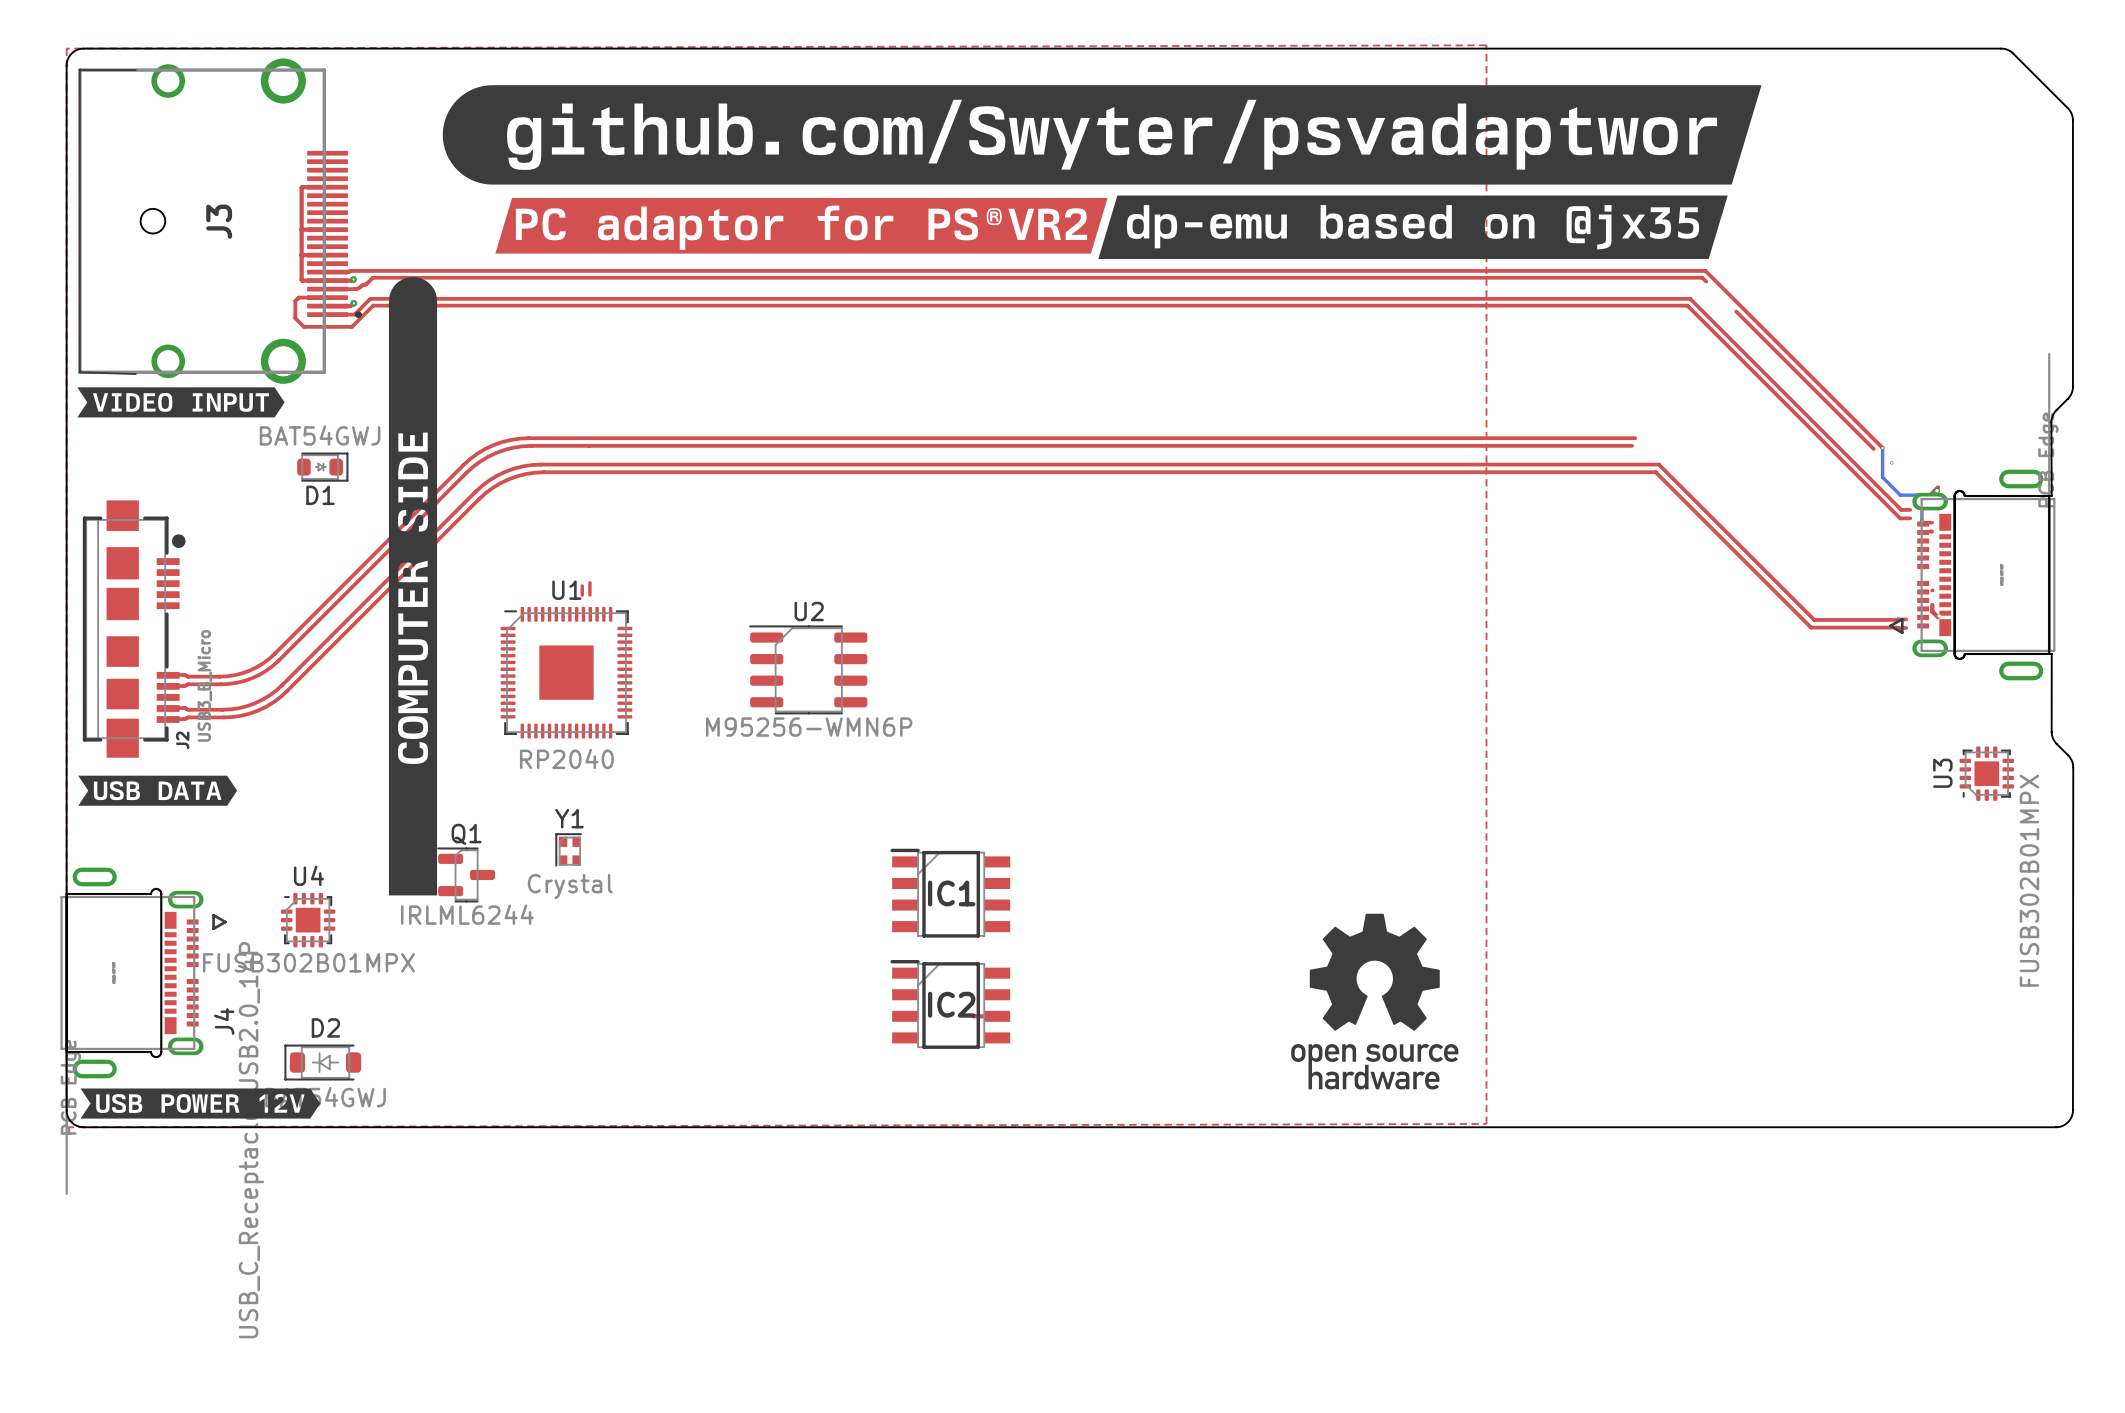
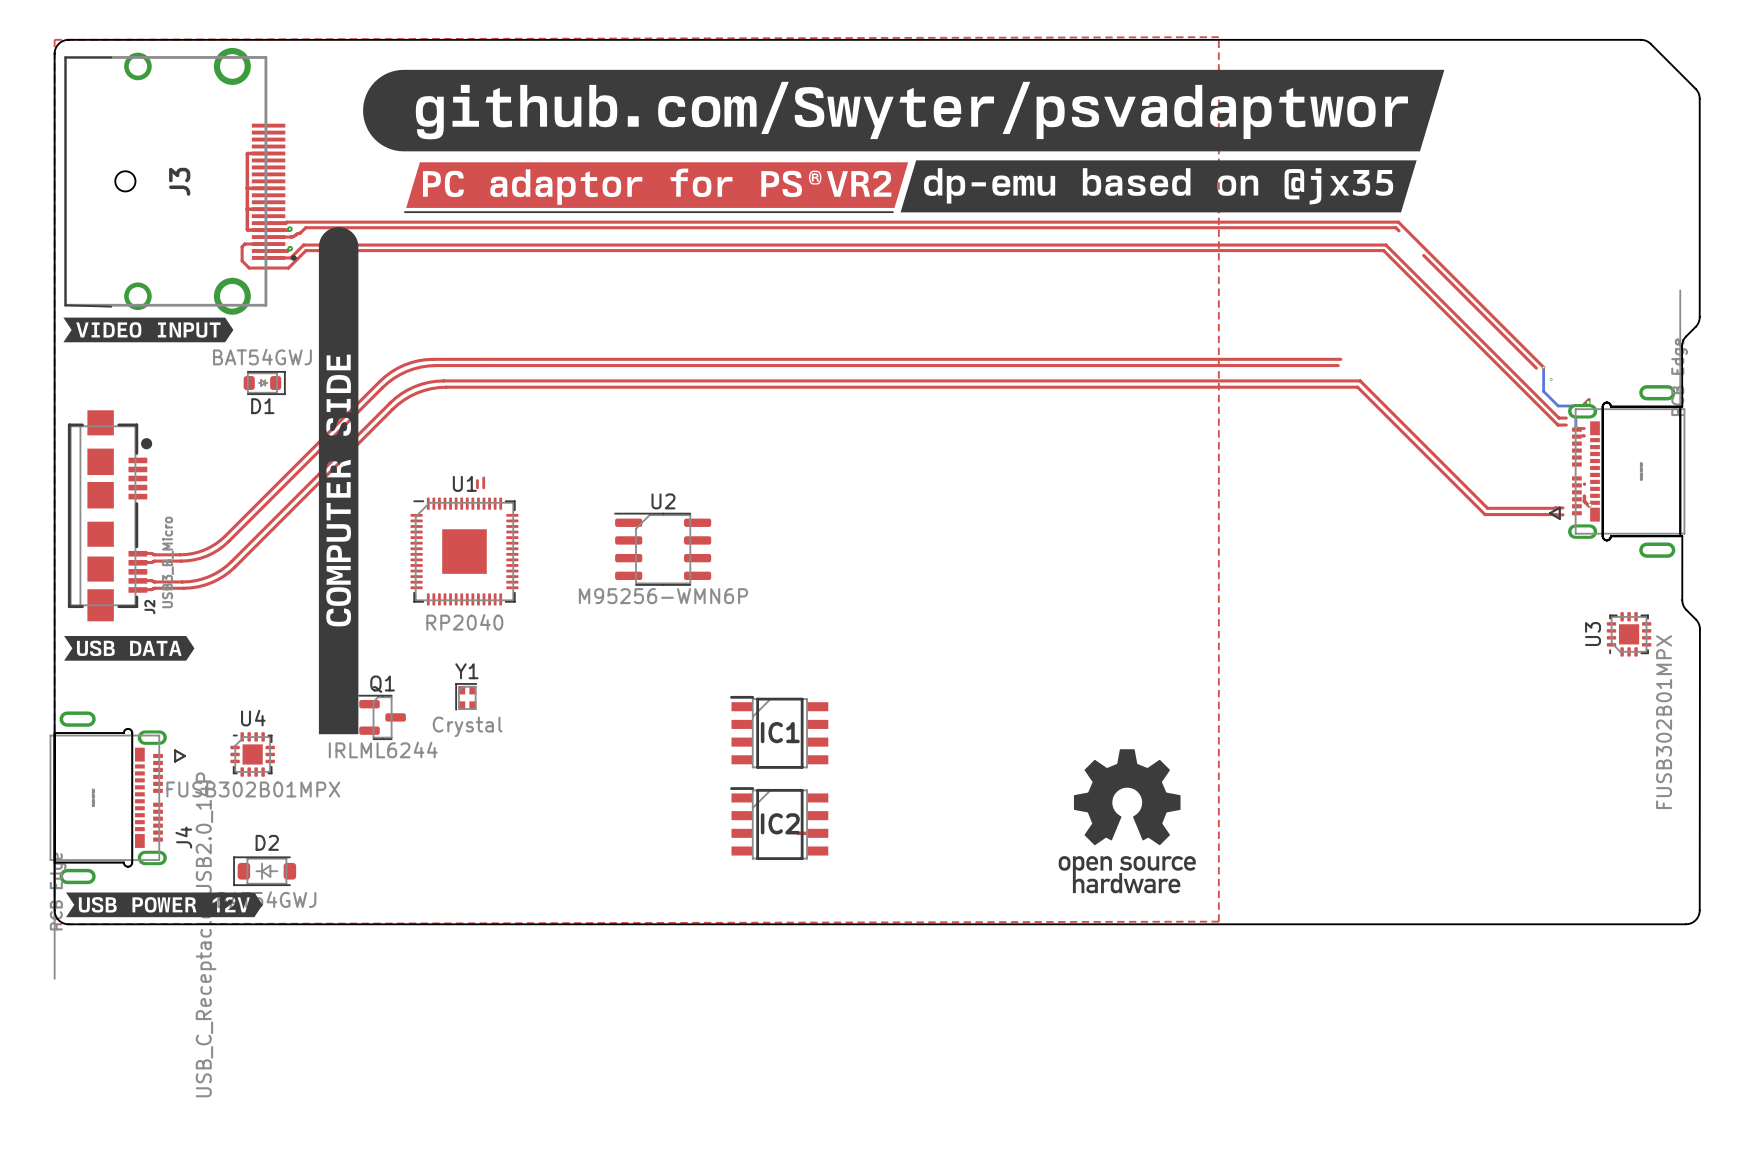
line: none -> (404, 212) (892, 212)

